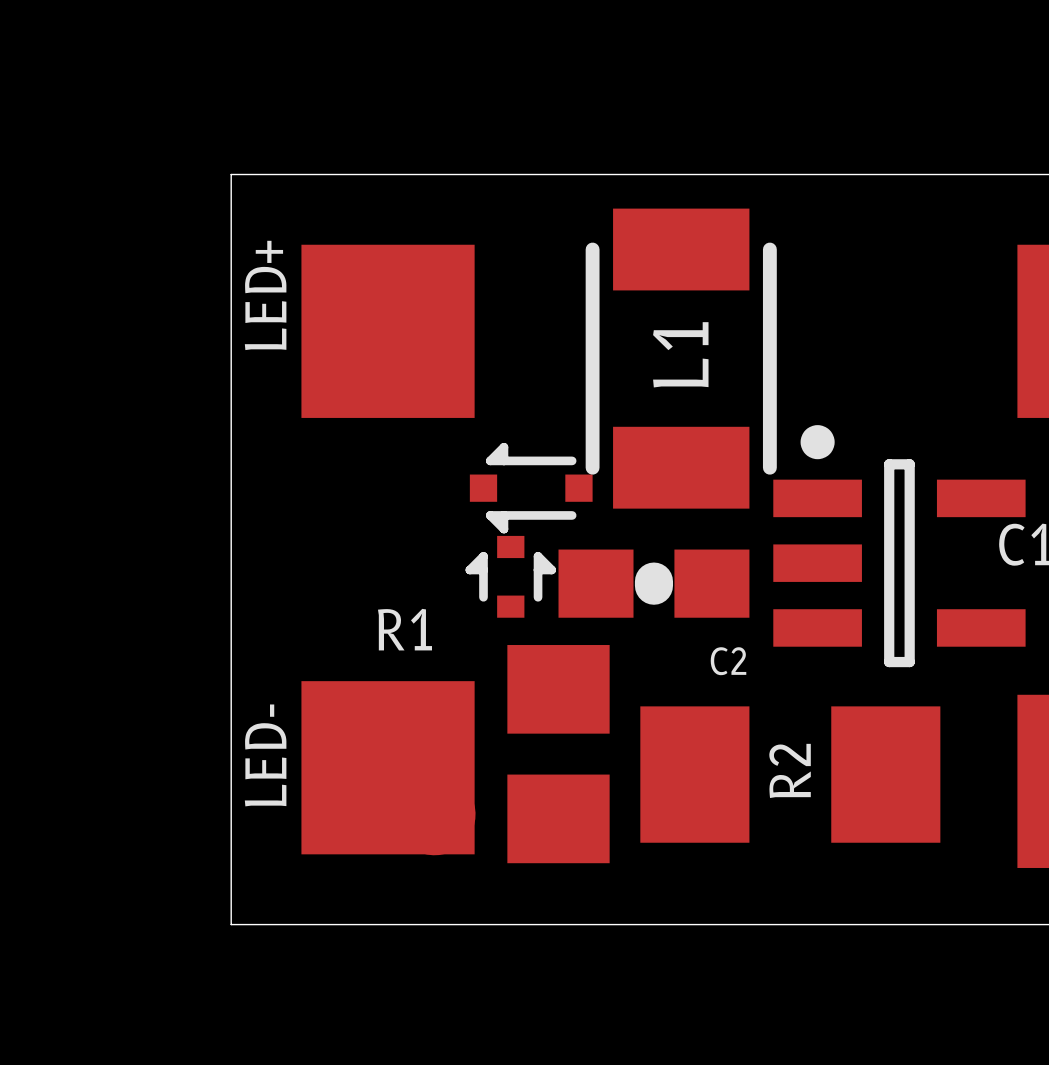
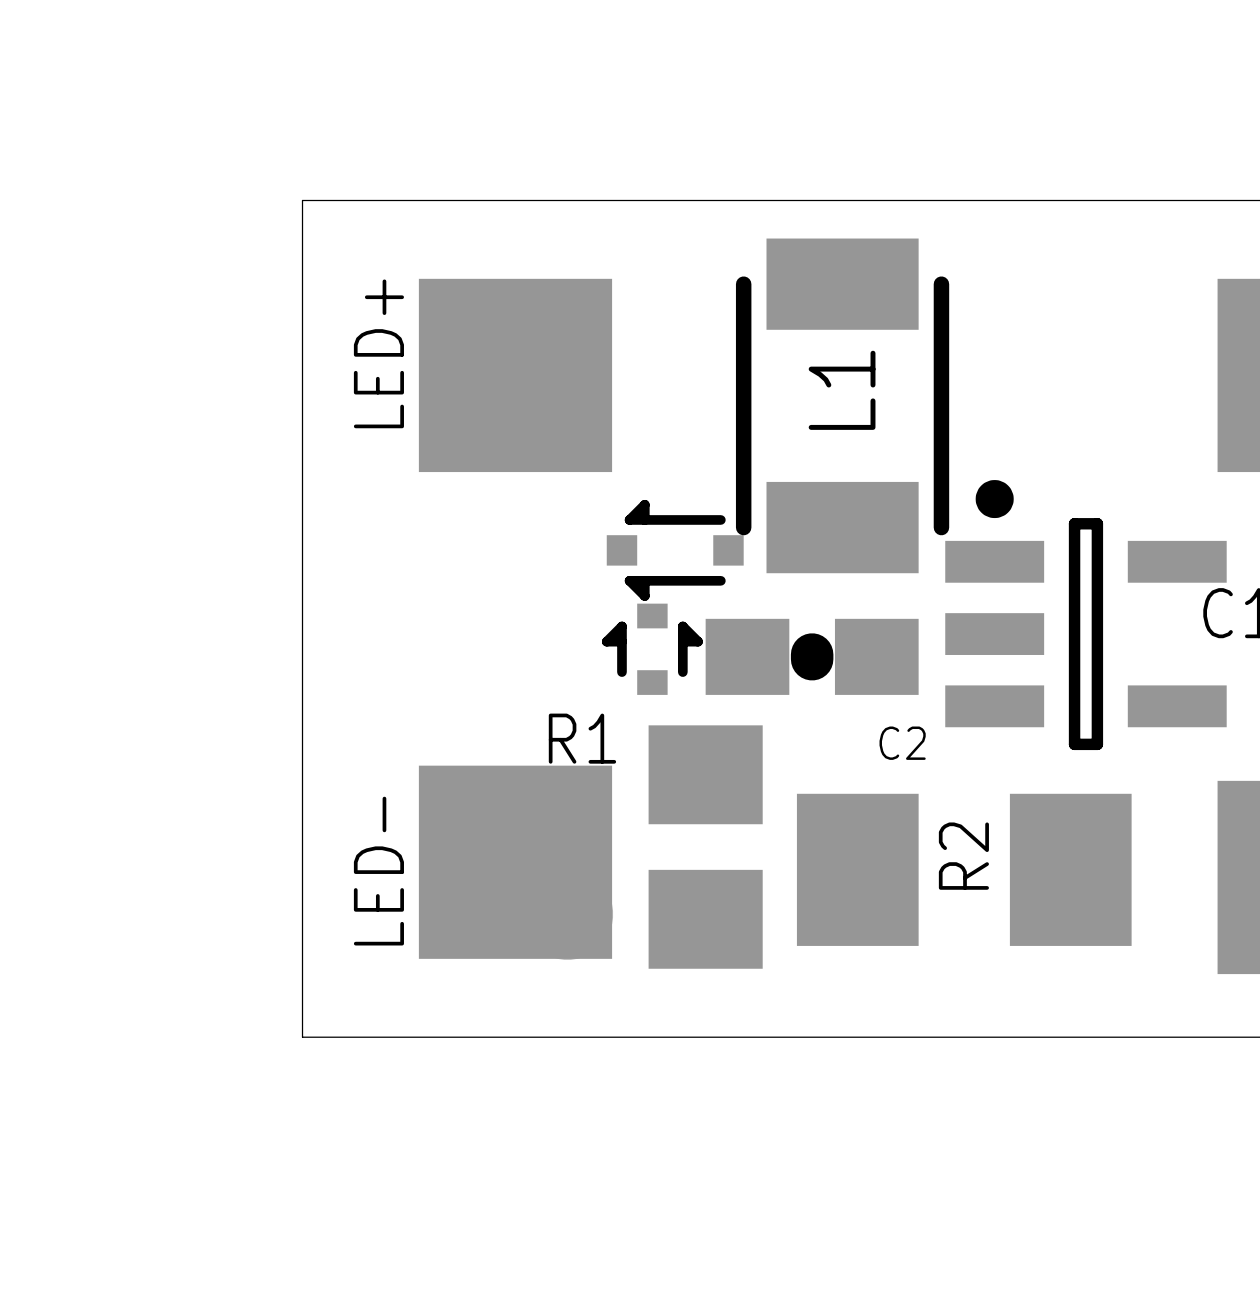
board edge: (231, 174) (231, 924) -> (340, 200) (302, 200) (302, 1037) (340, 1037)
R1 name position: R1 (404, 629) -> R1 (582, 738)

